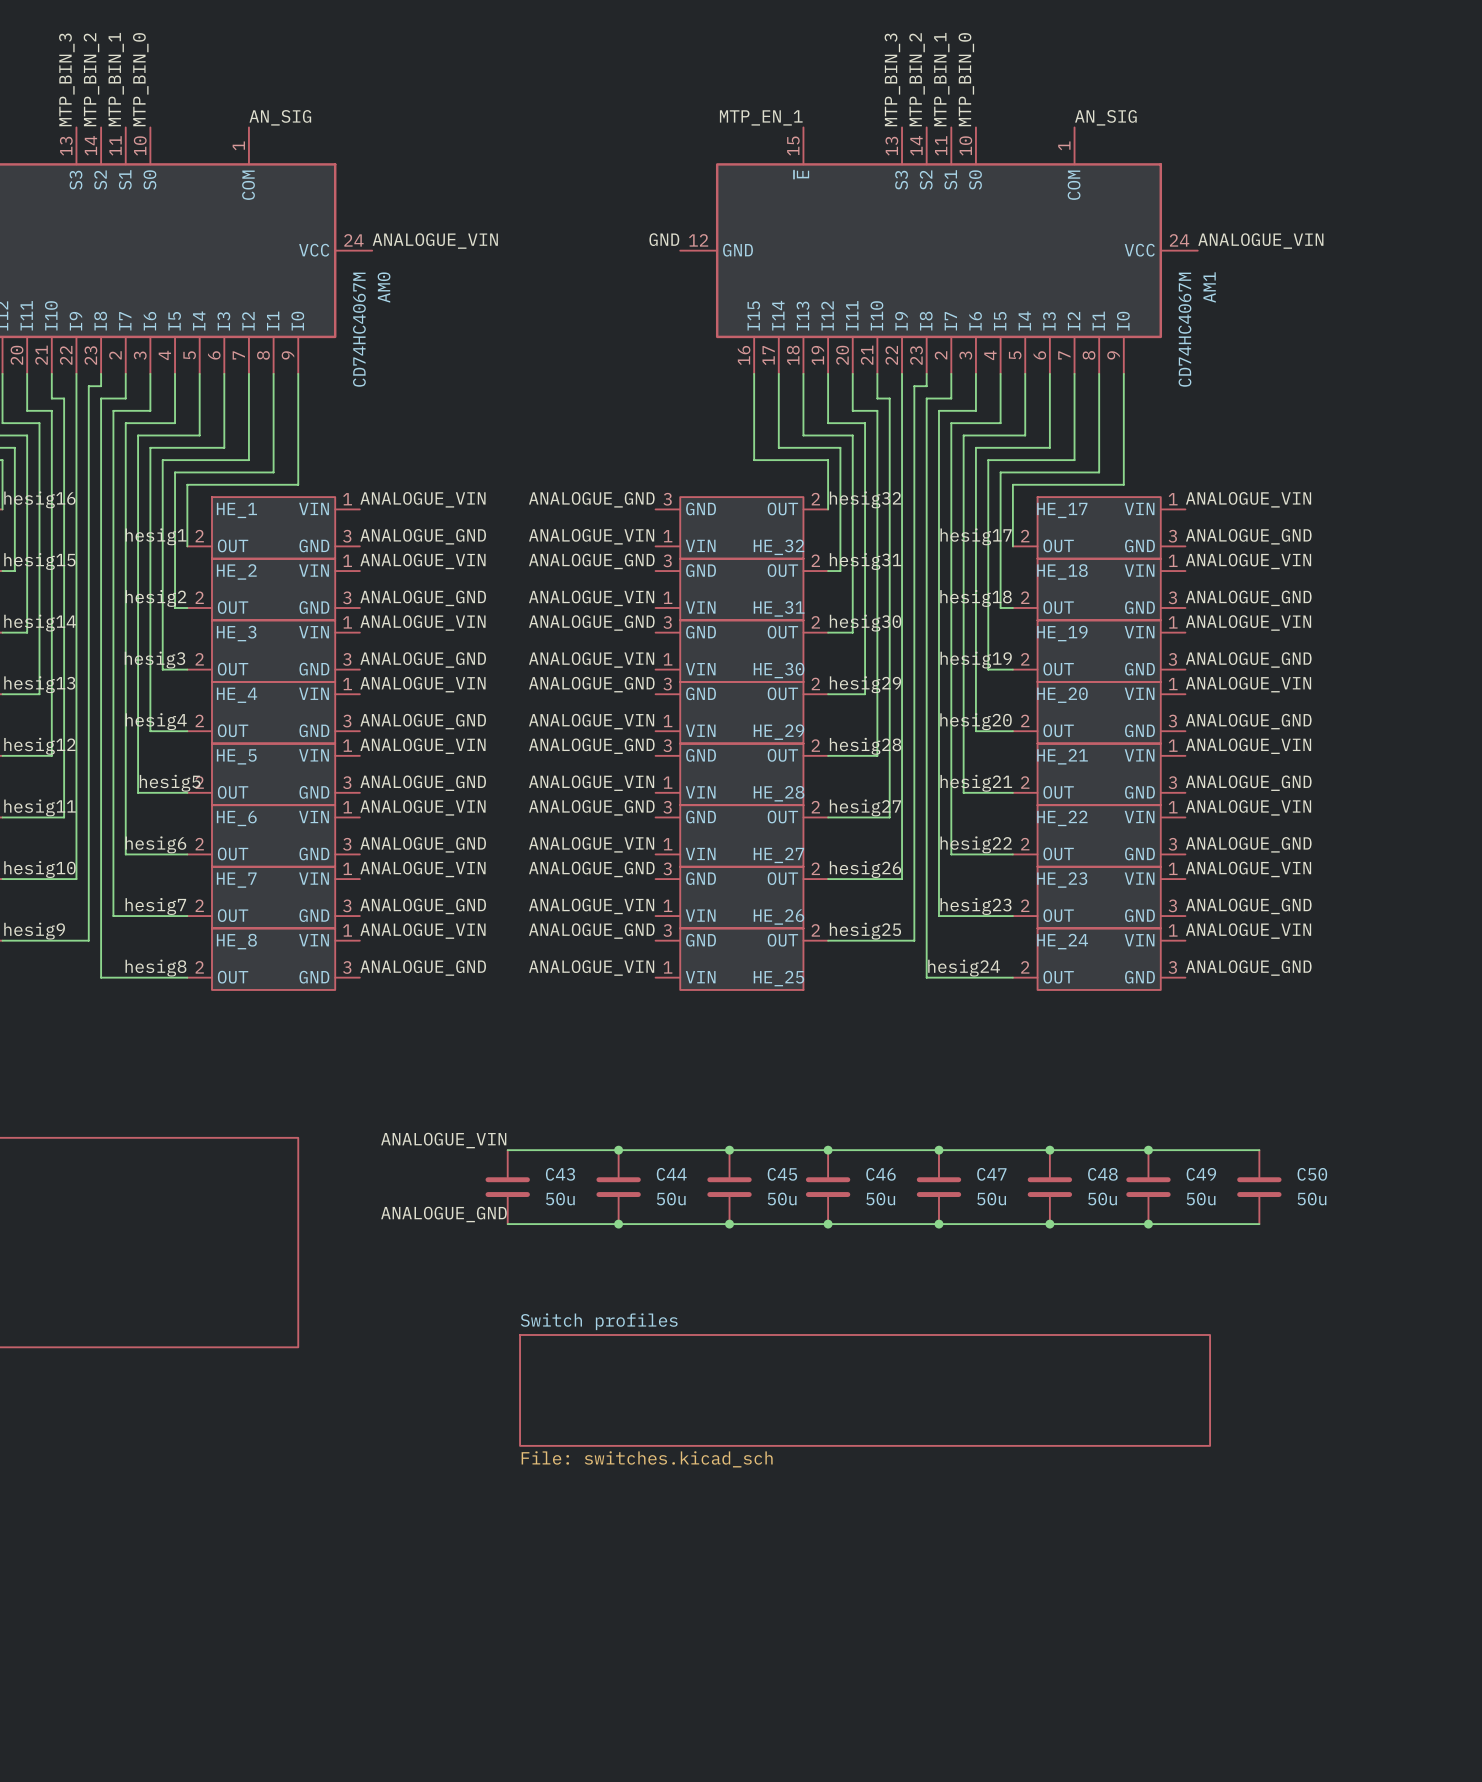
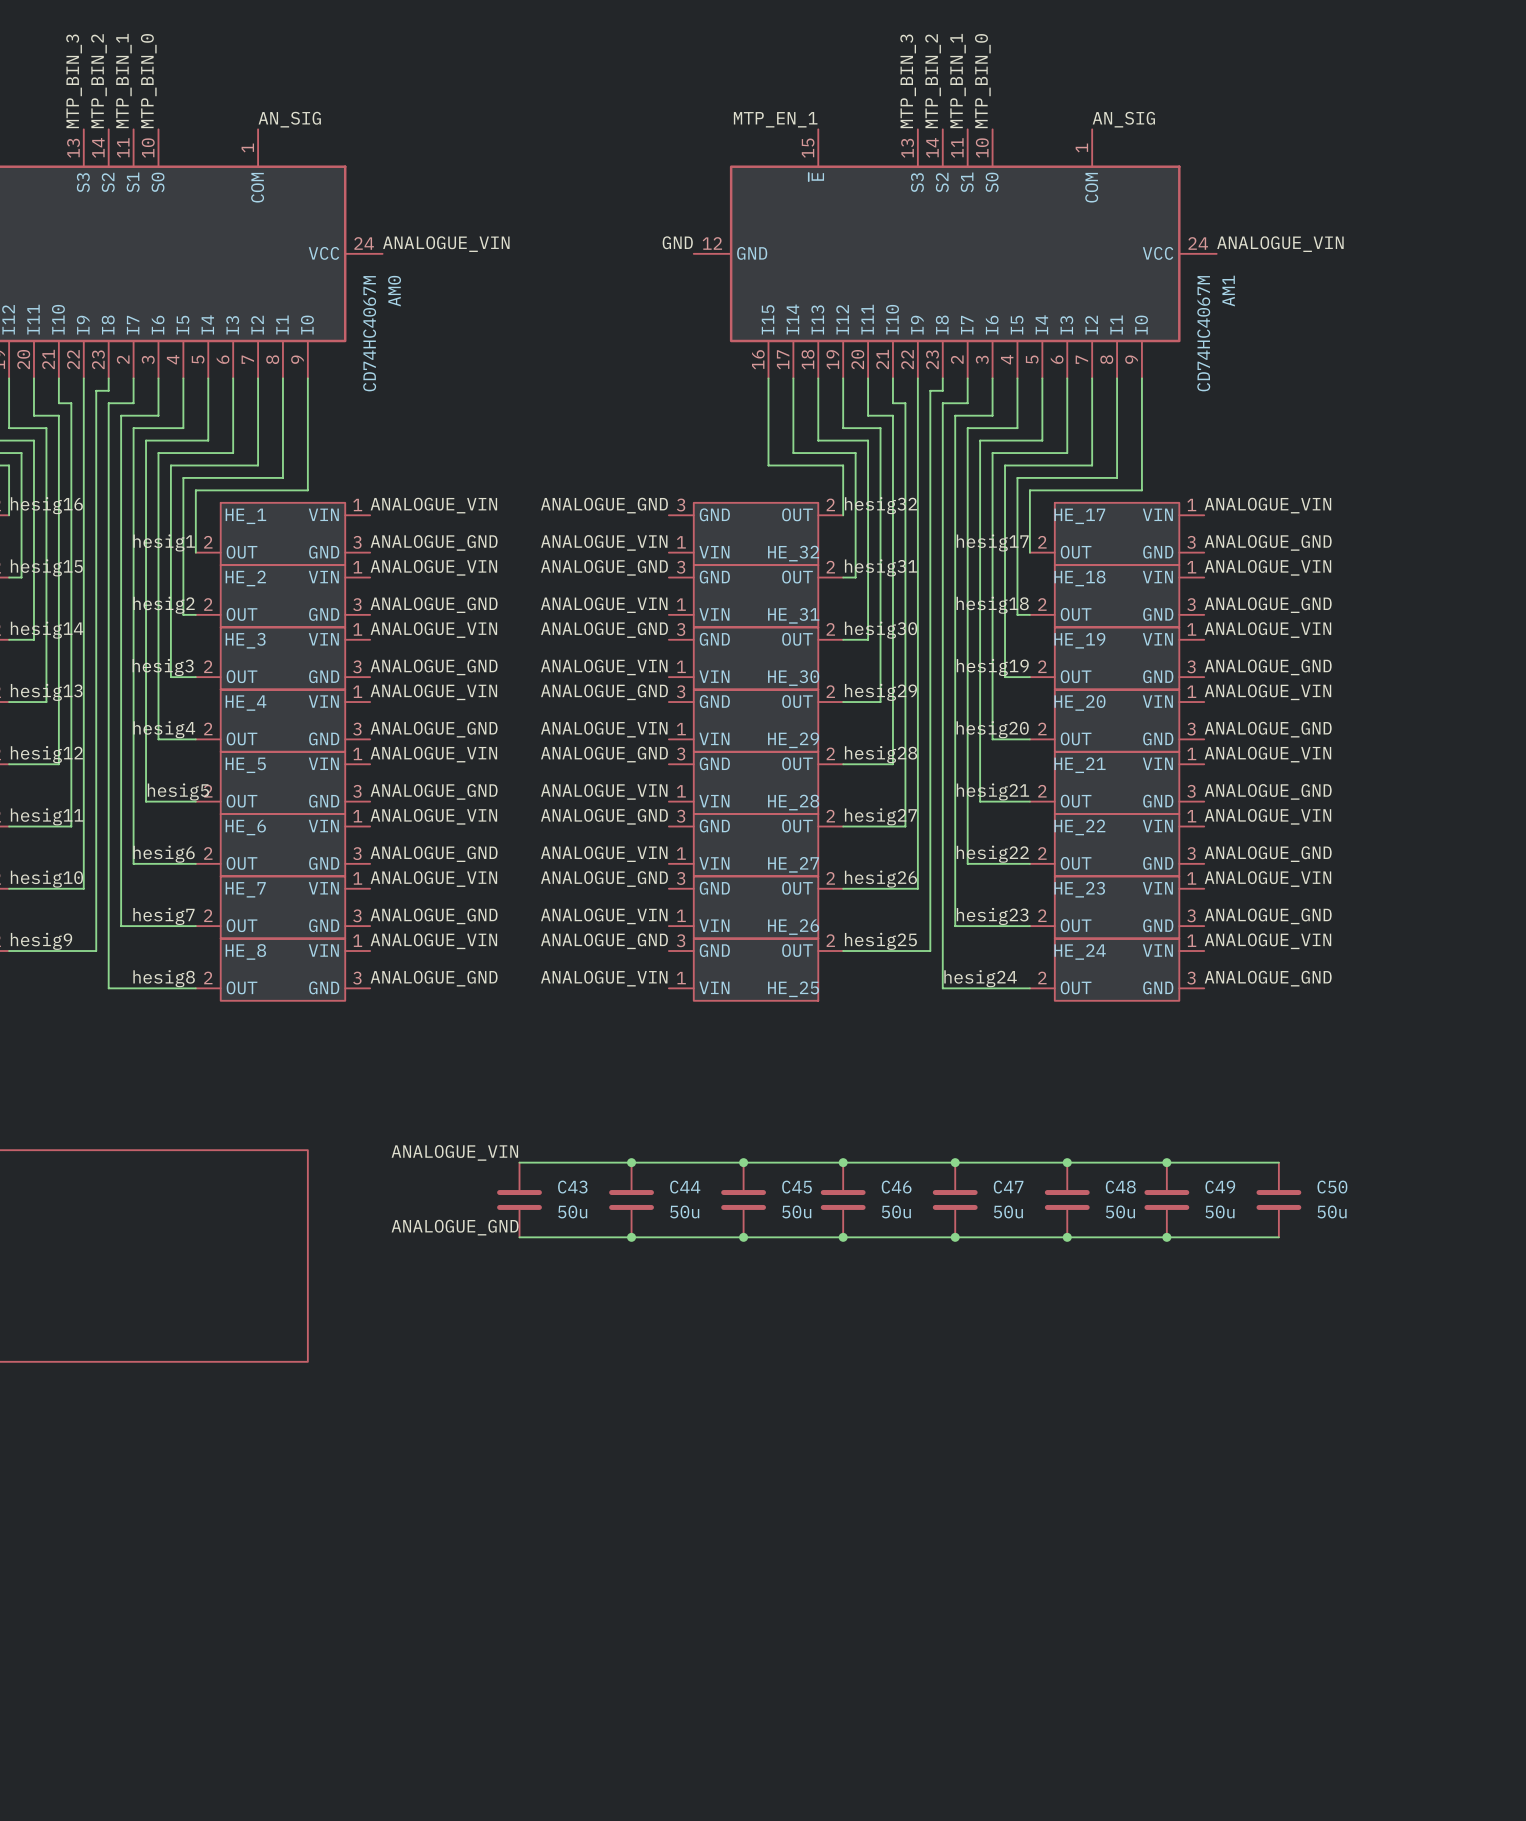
sheet Switch profiles: File: switches.kicad_sch (865, 1390) -> none

